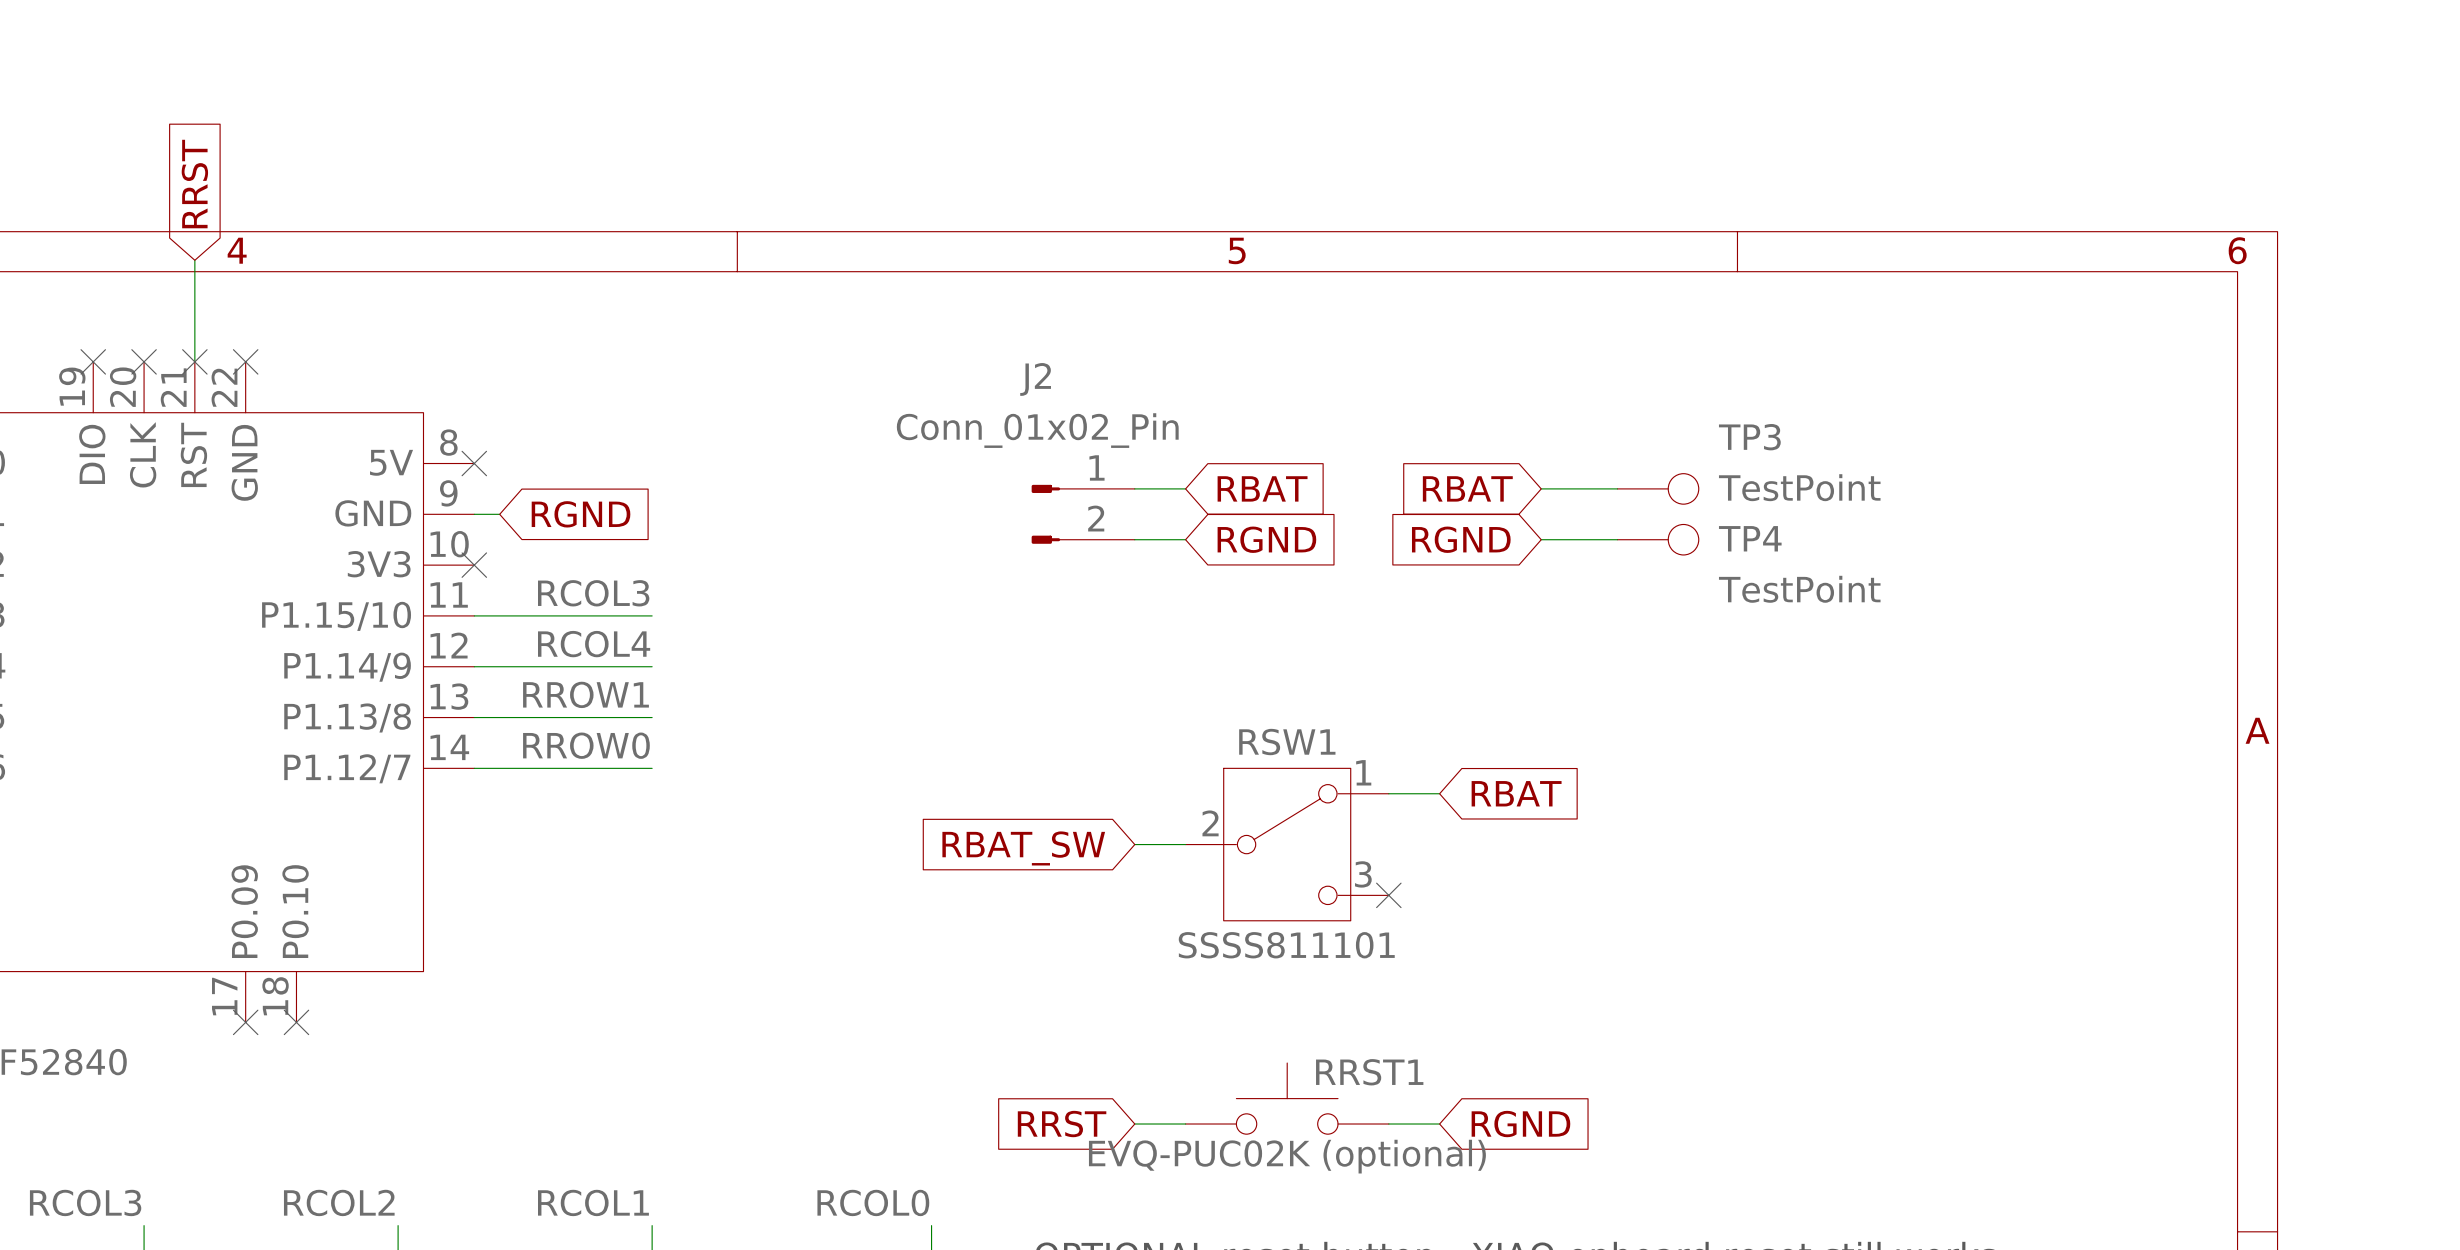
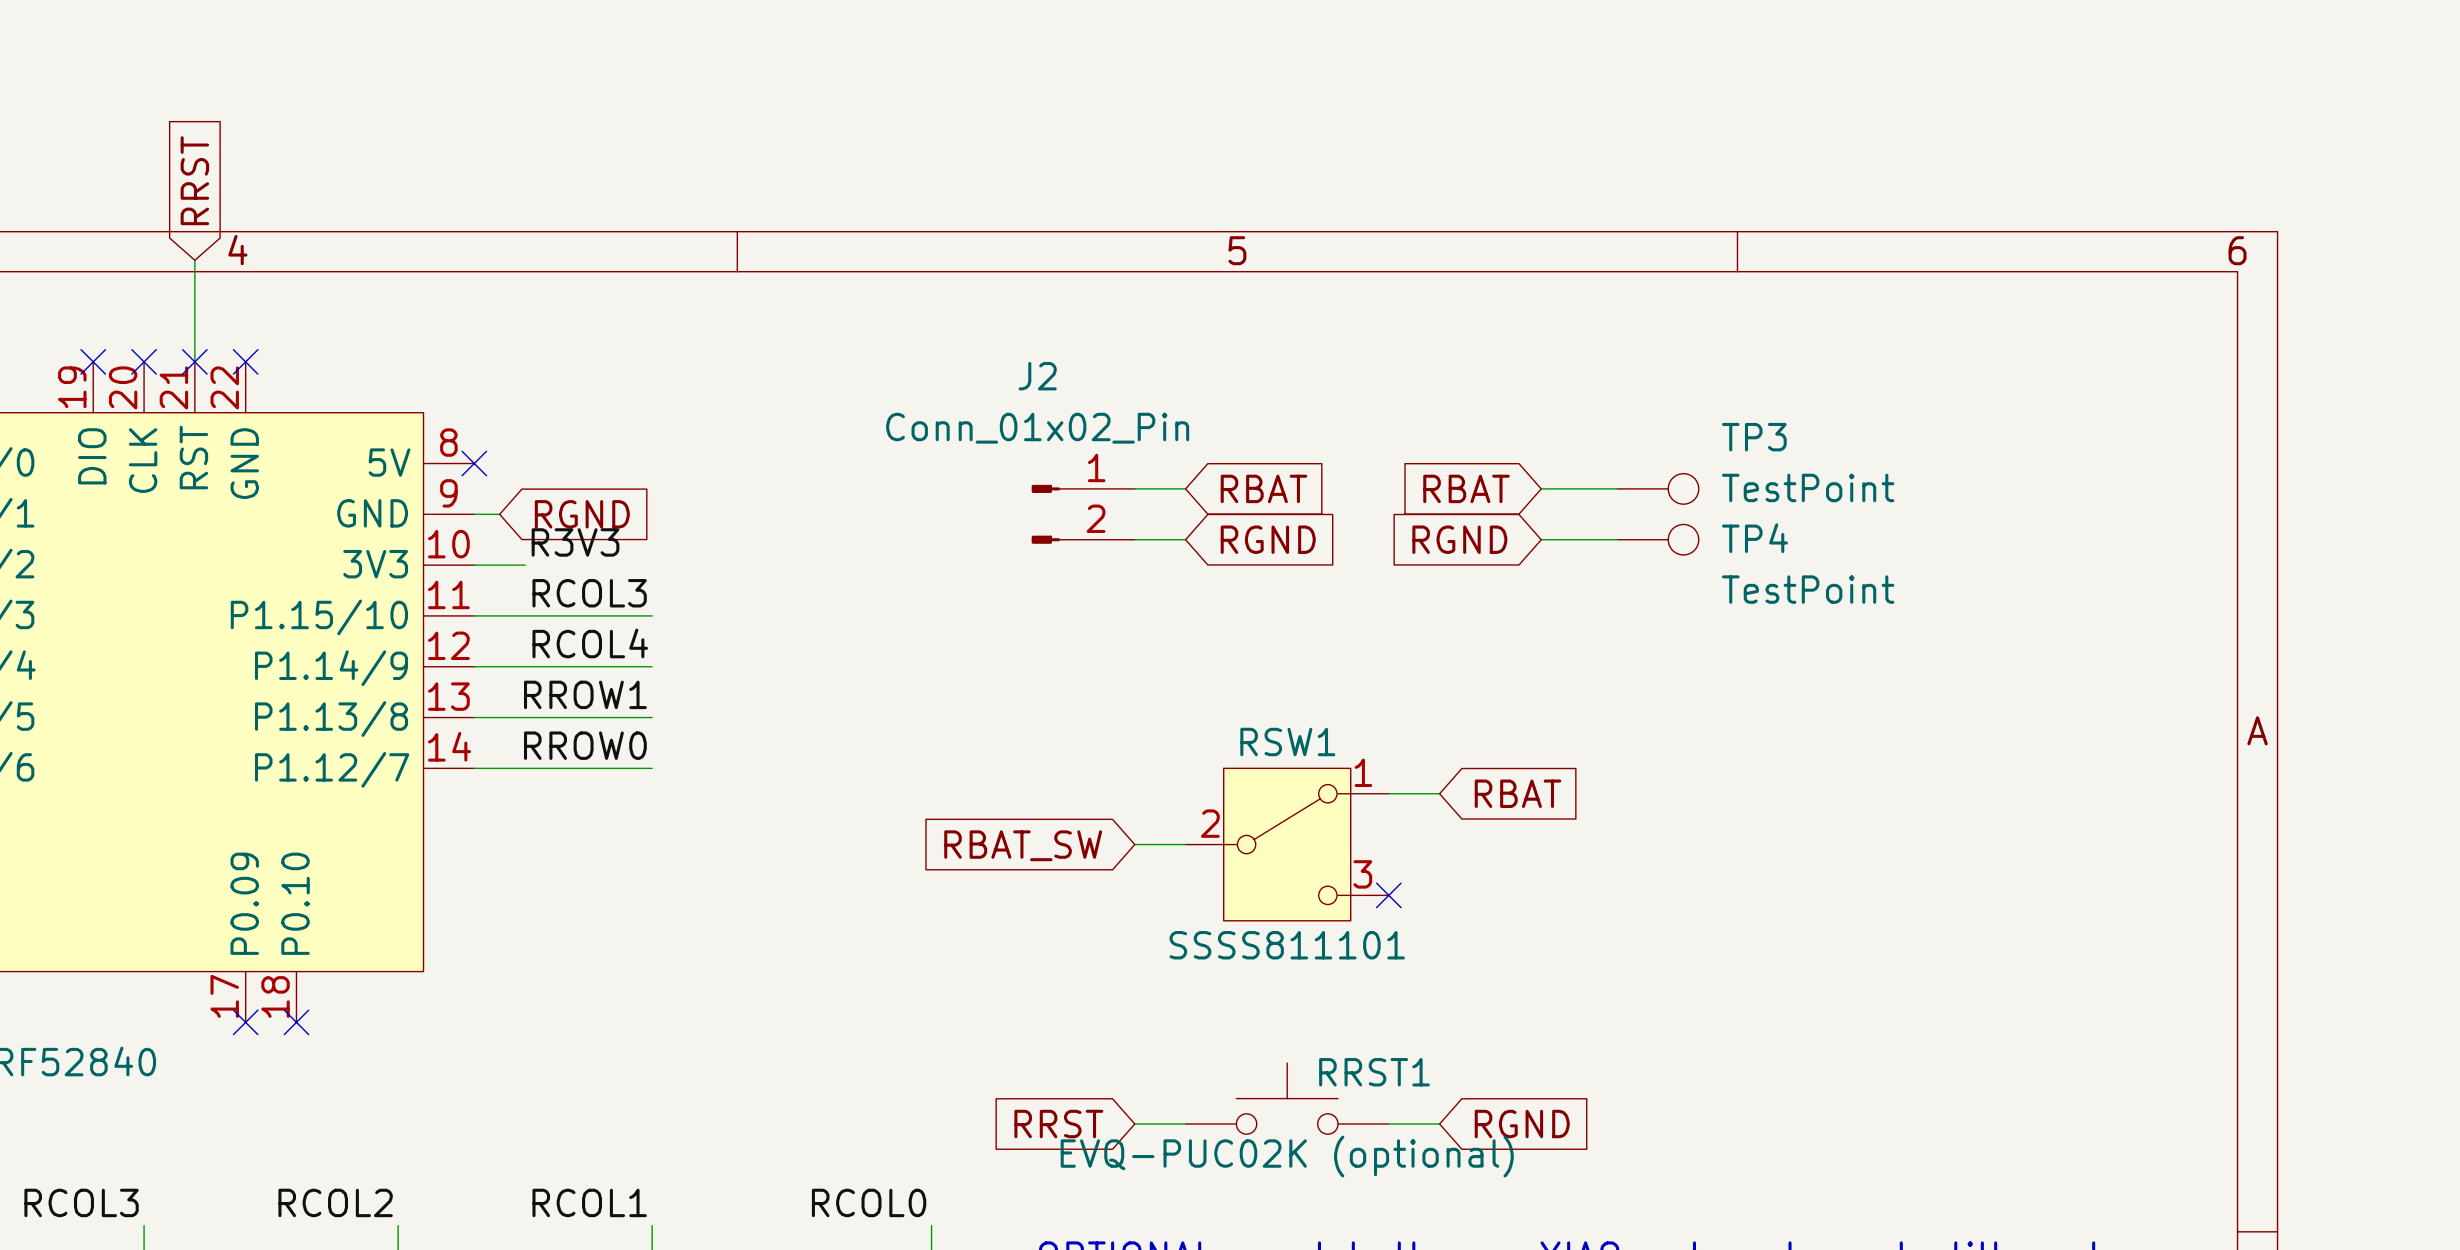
label: none -> R3V3 (575, 542)
wire: none -> (474, 565) (525, 565)
no-connect mark: (474, 565) -> none

